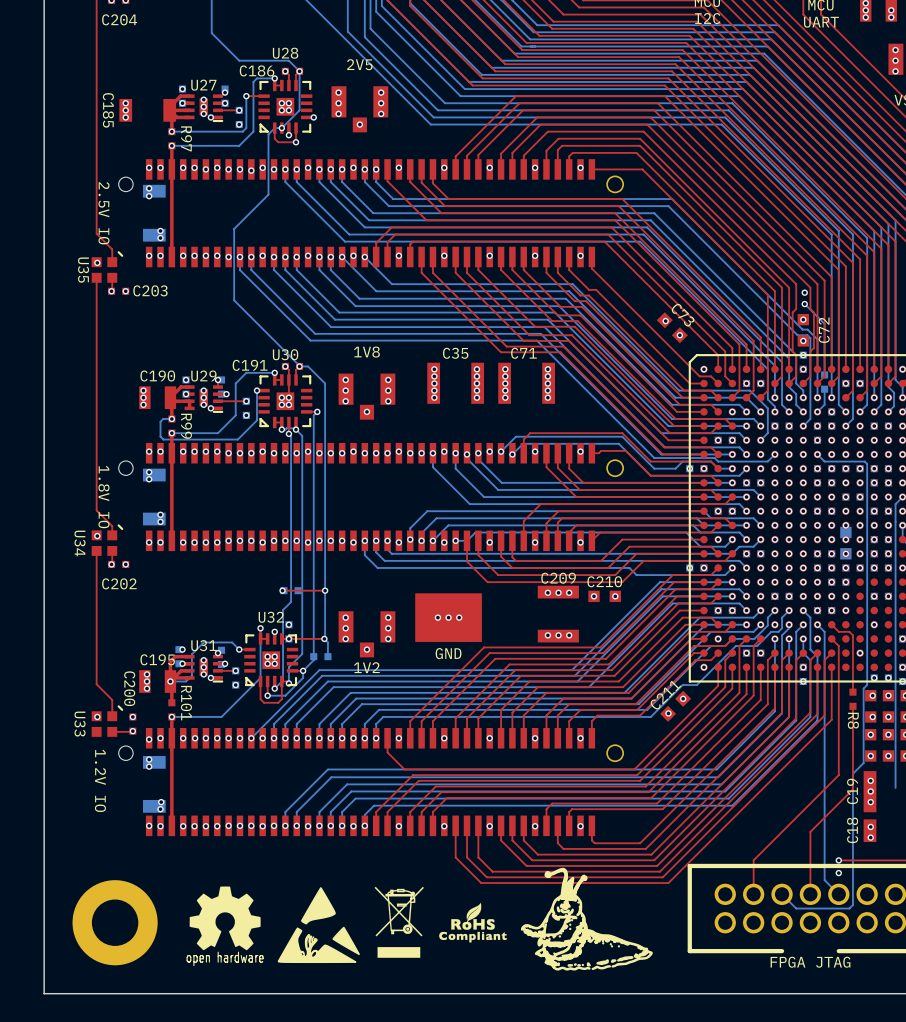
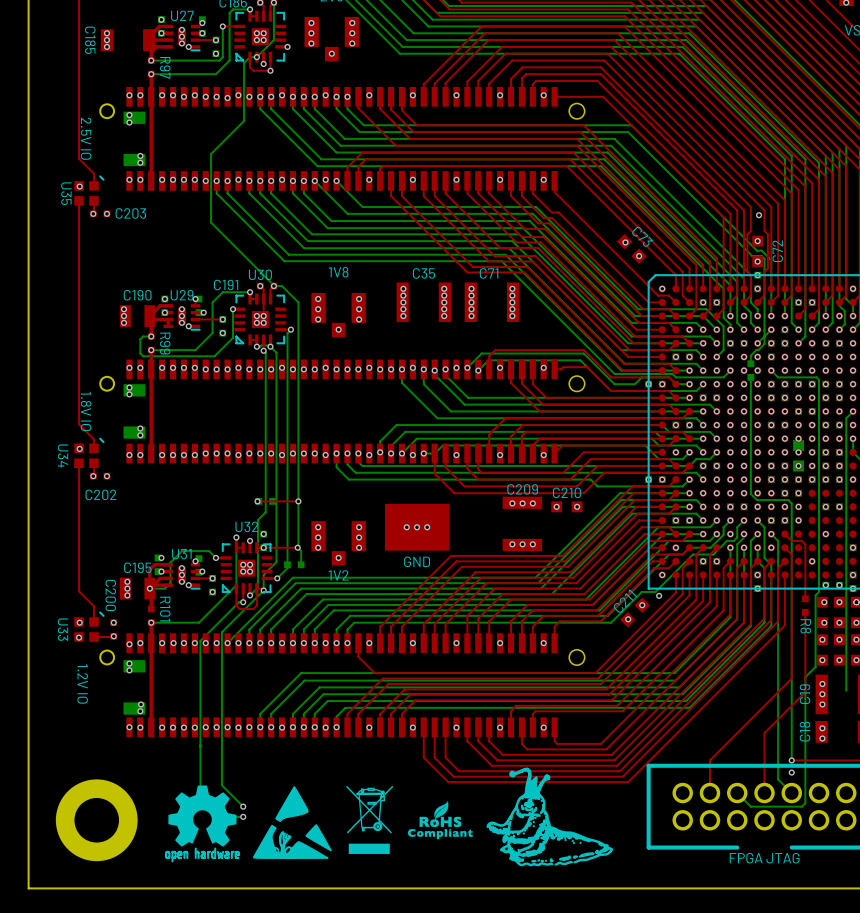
bottom track: (804, 304) (824, 323) (824, 374) -> none
via: (804, 304) -> none
part position: (824, 382) -> (750, 370)
bottom track: (824, 389) (824, 404) (817, 411) -> (750, 363) (750, 355) (764, 344) (764, 336) (771, 329)
bottom track: none -> (750, 377) (750, 493) (756, 500) (788, 500) (791, 503) (791, 760)
bottom track: (303, 670) (303, 677) (285, 695) (267, 695) -> (243, 816) (229, 816) (200, 787) (200, 640) (239, 602) (243, 602)
bottom track: none -> (263, 590) (221, 632) (221, 785) (243, 806)
via: none -> (659, 595)
via: none -> (79, 637)
via: none -> (243, 806)
via: none -> (243, 816)

